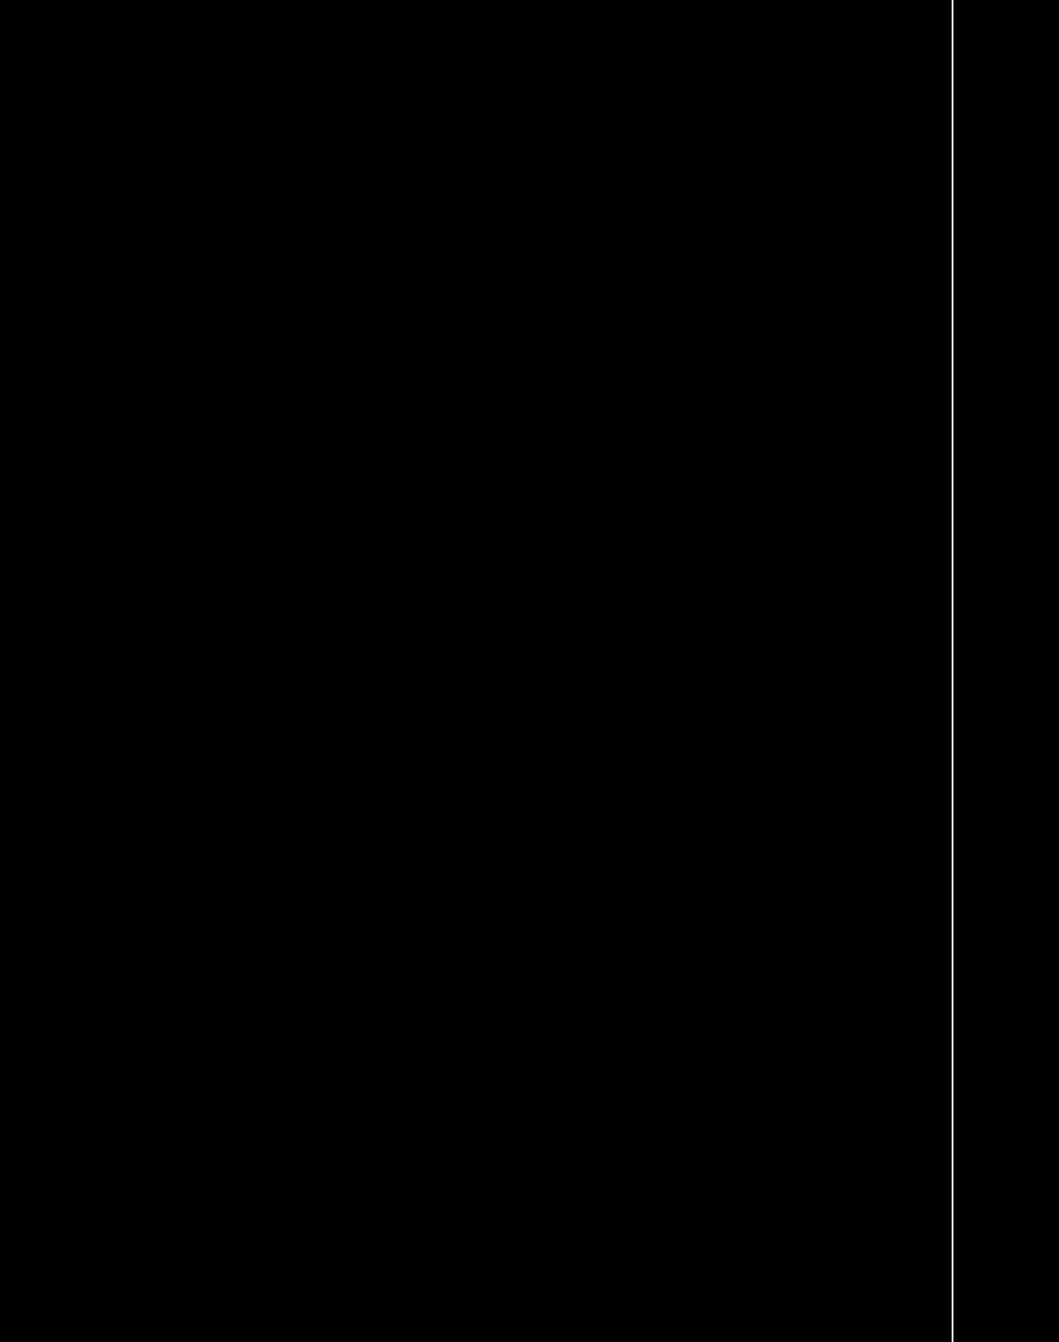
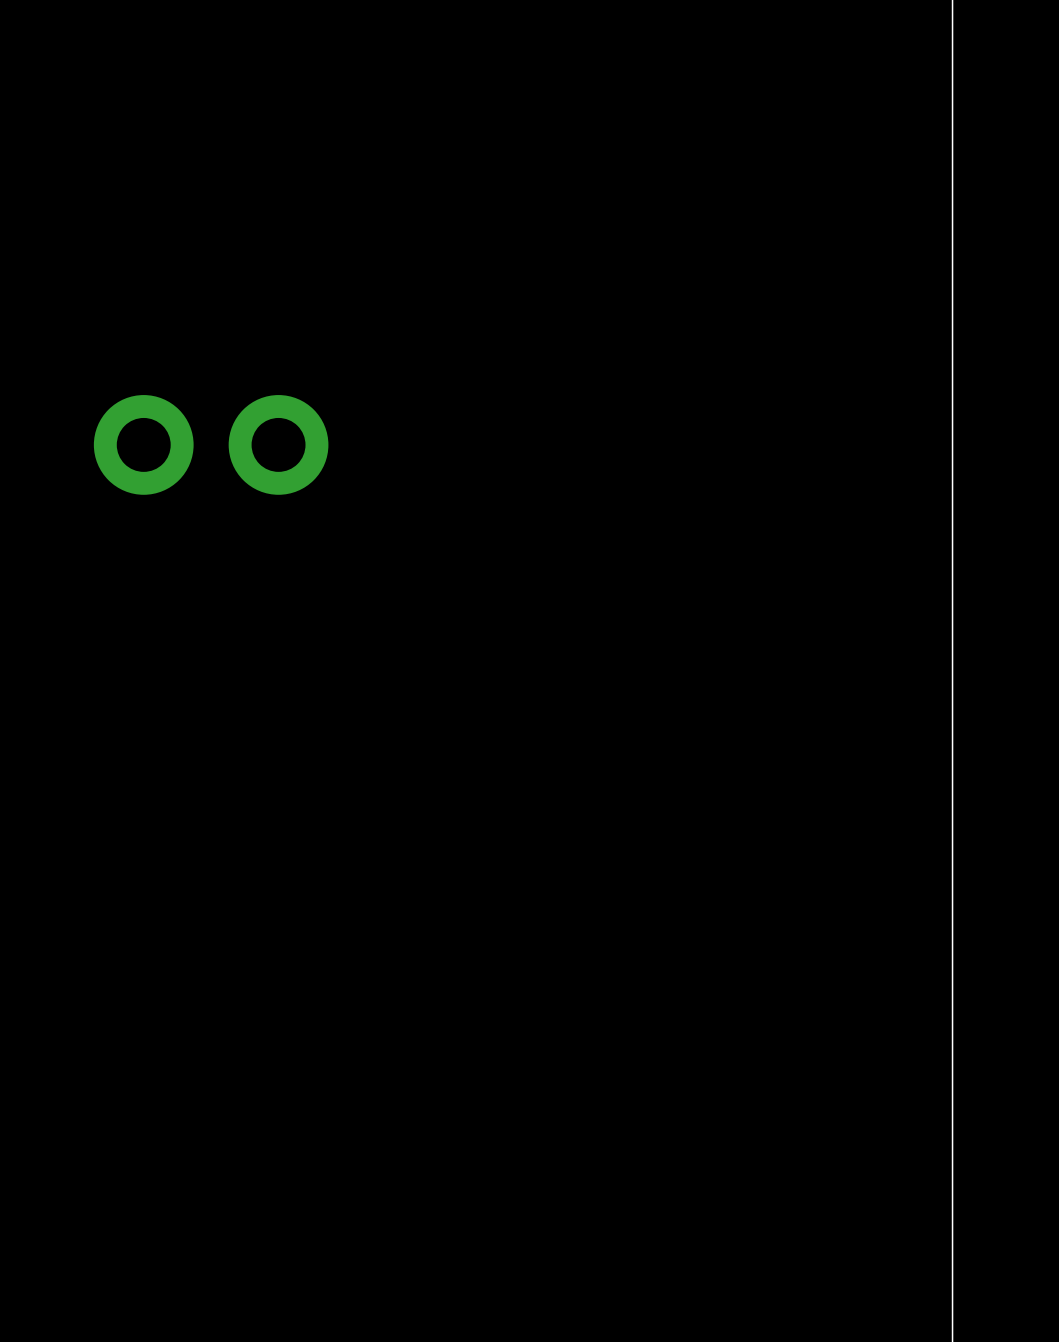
part: none -> (143, 444)
part: none -> (278, 444)

